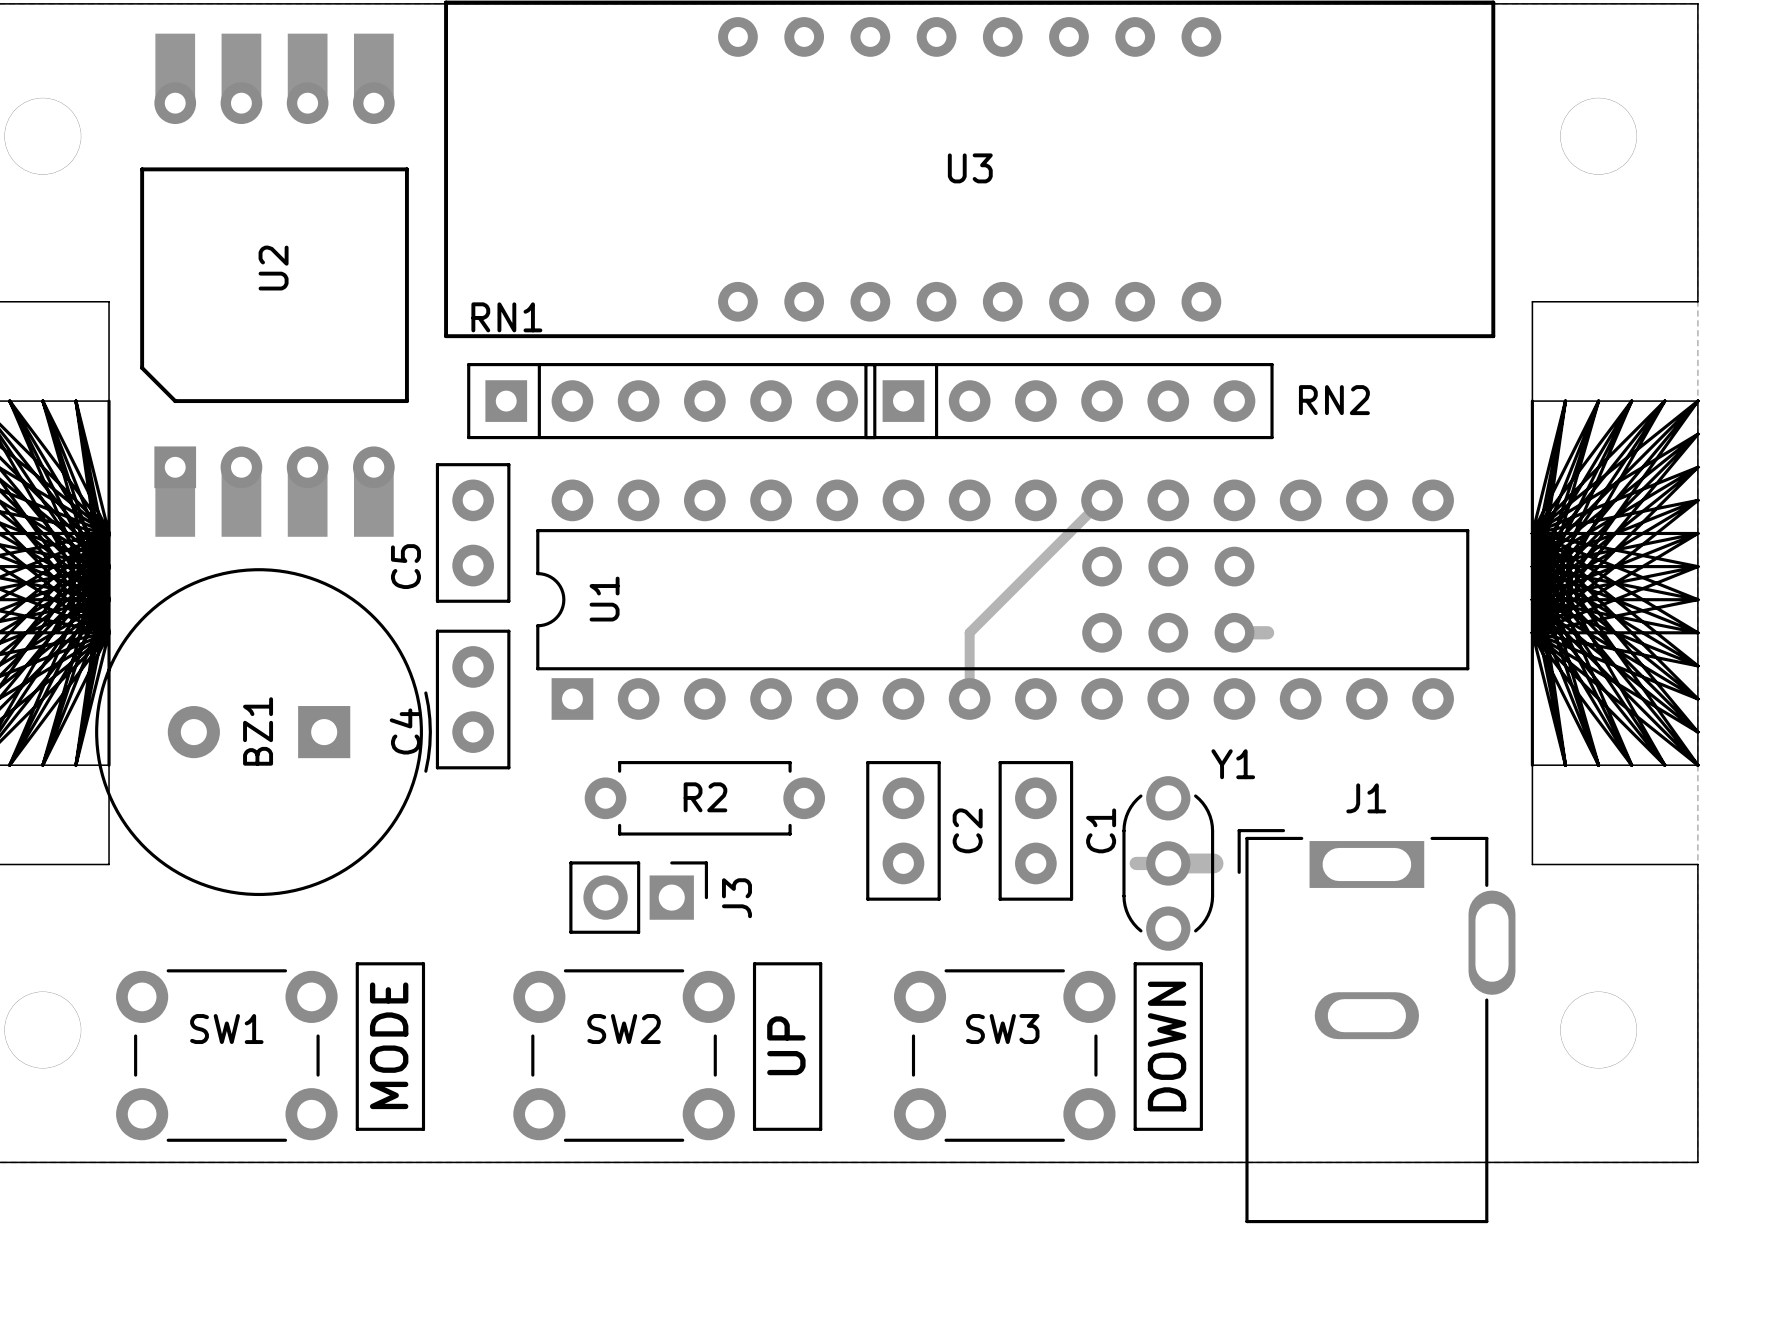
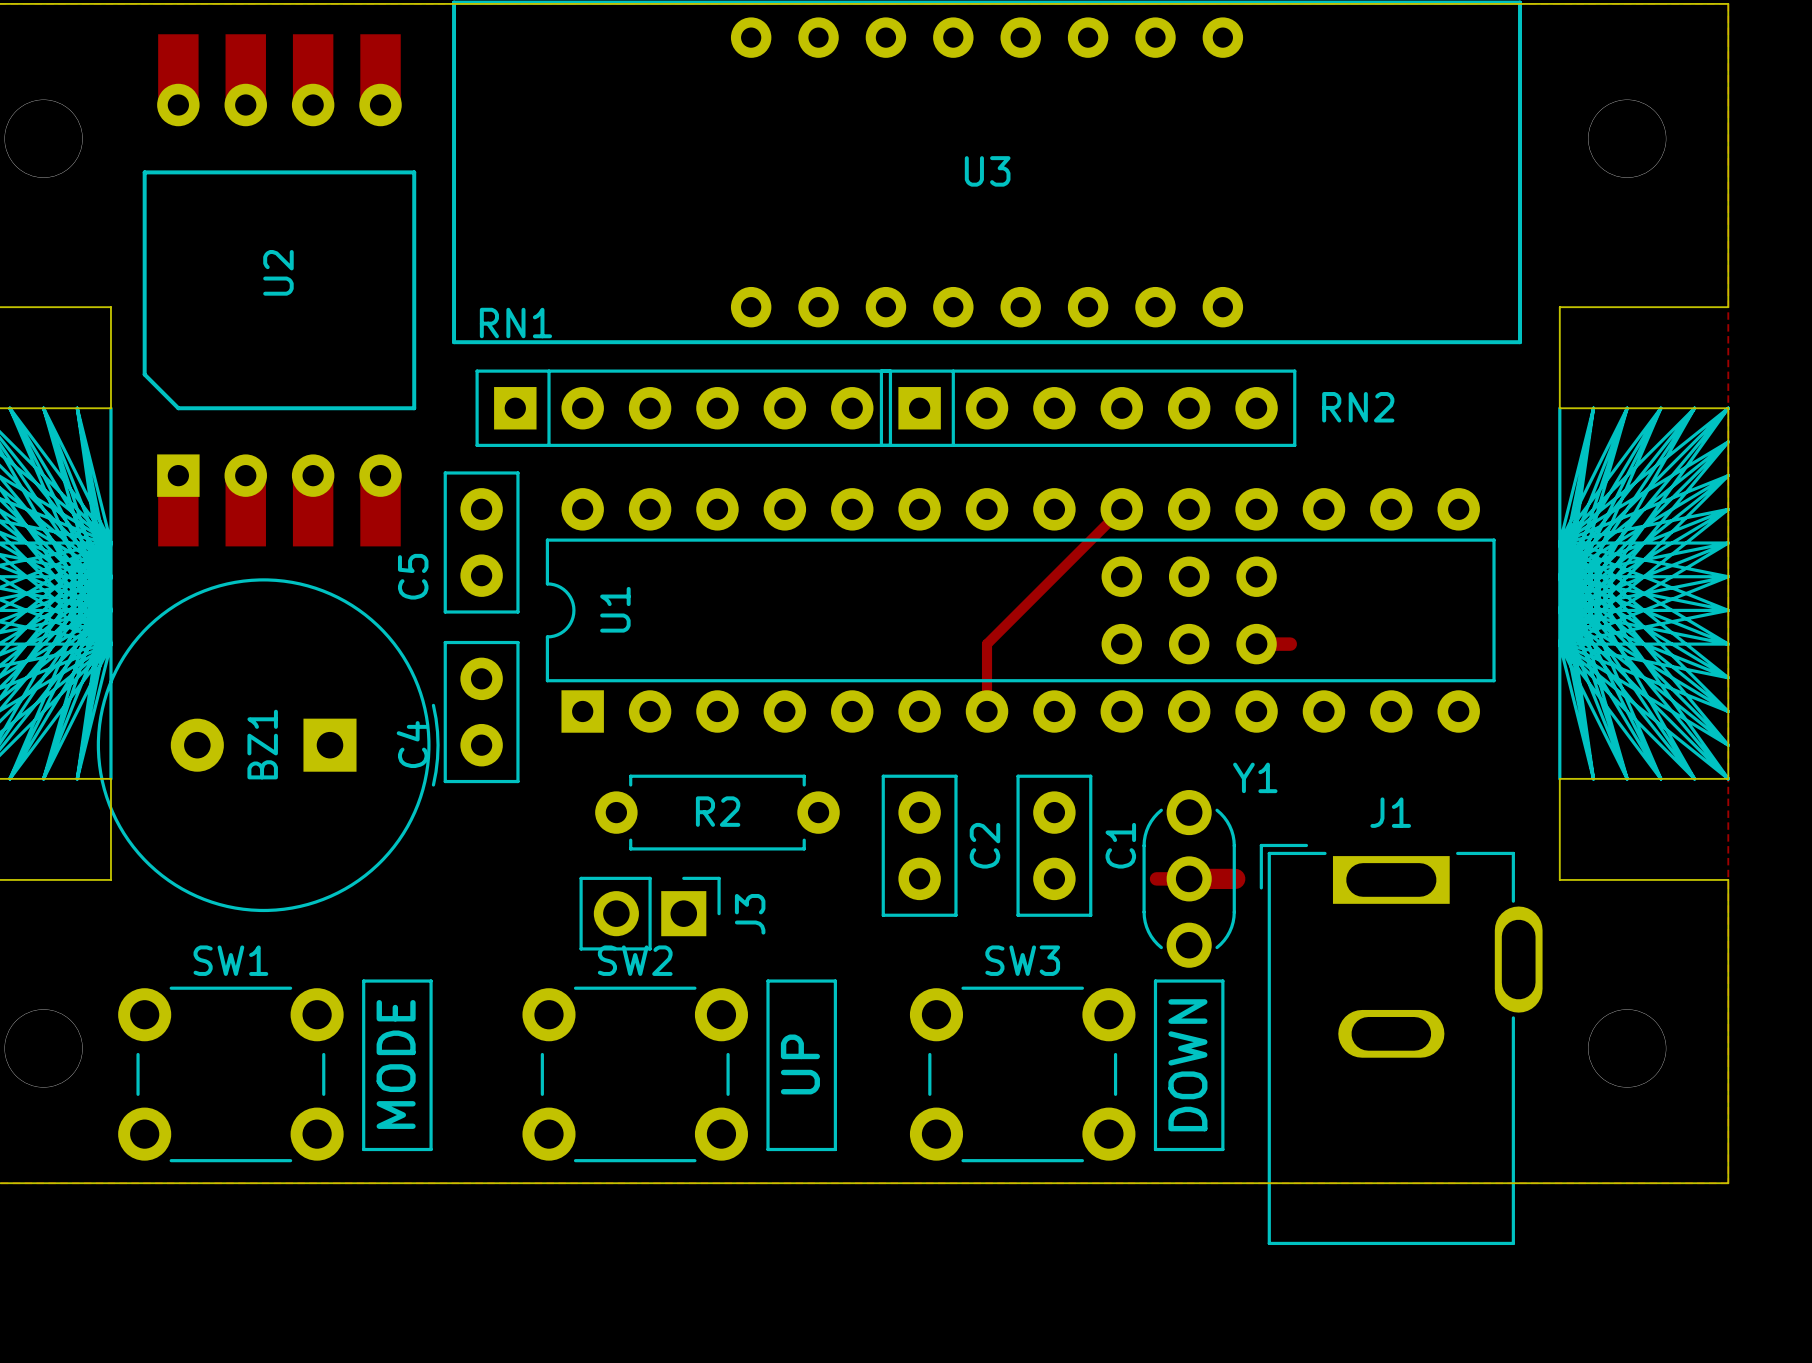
SW1 name position: SW1 (226, 1029) -> SW1 (230, 960)
SW2 name position: SW2 (624, 1029) -> SW2 (635, 960)
SW3 name position: SW3 (1002, 1029) -> SW3 (1022, 960)

